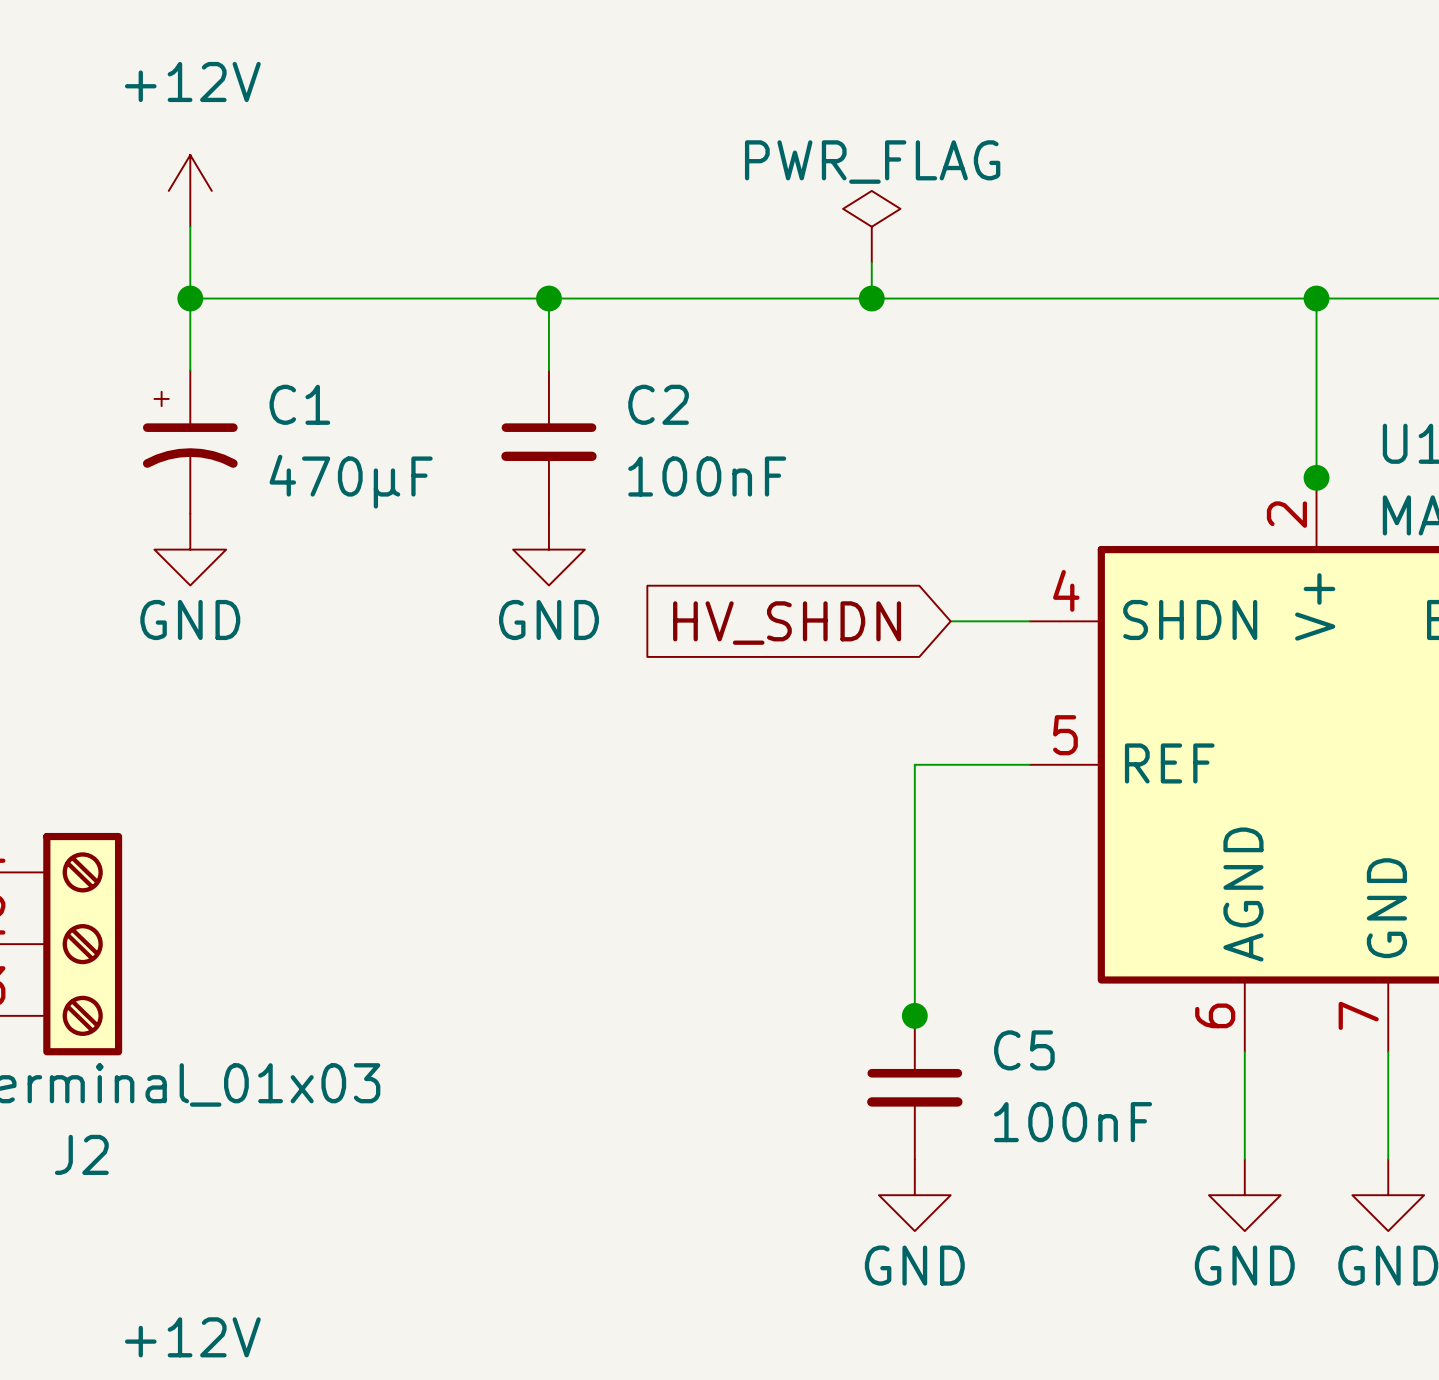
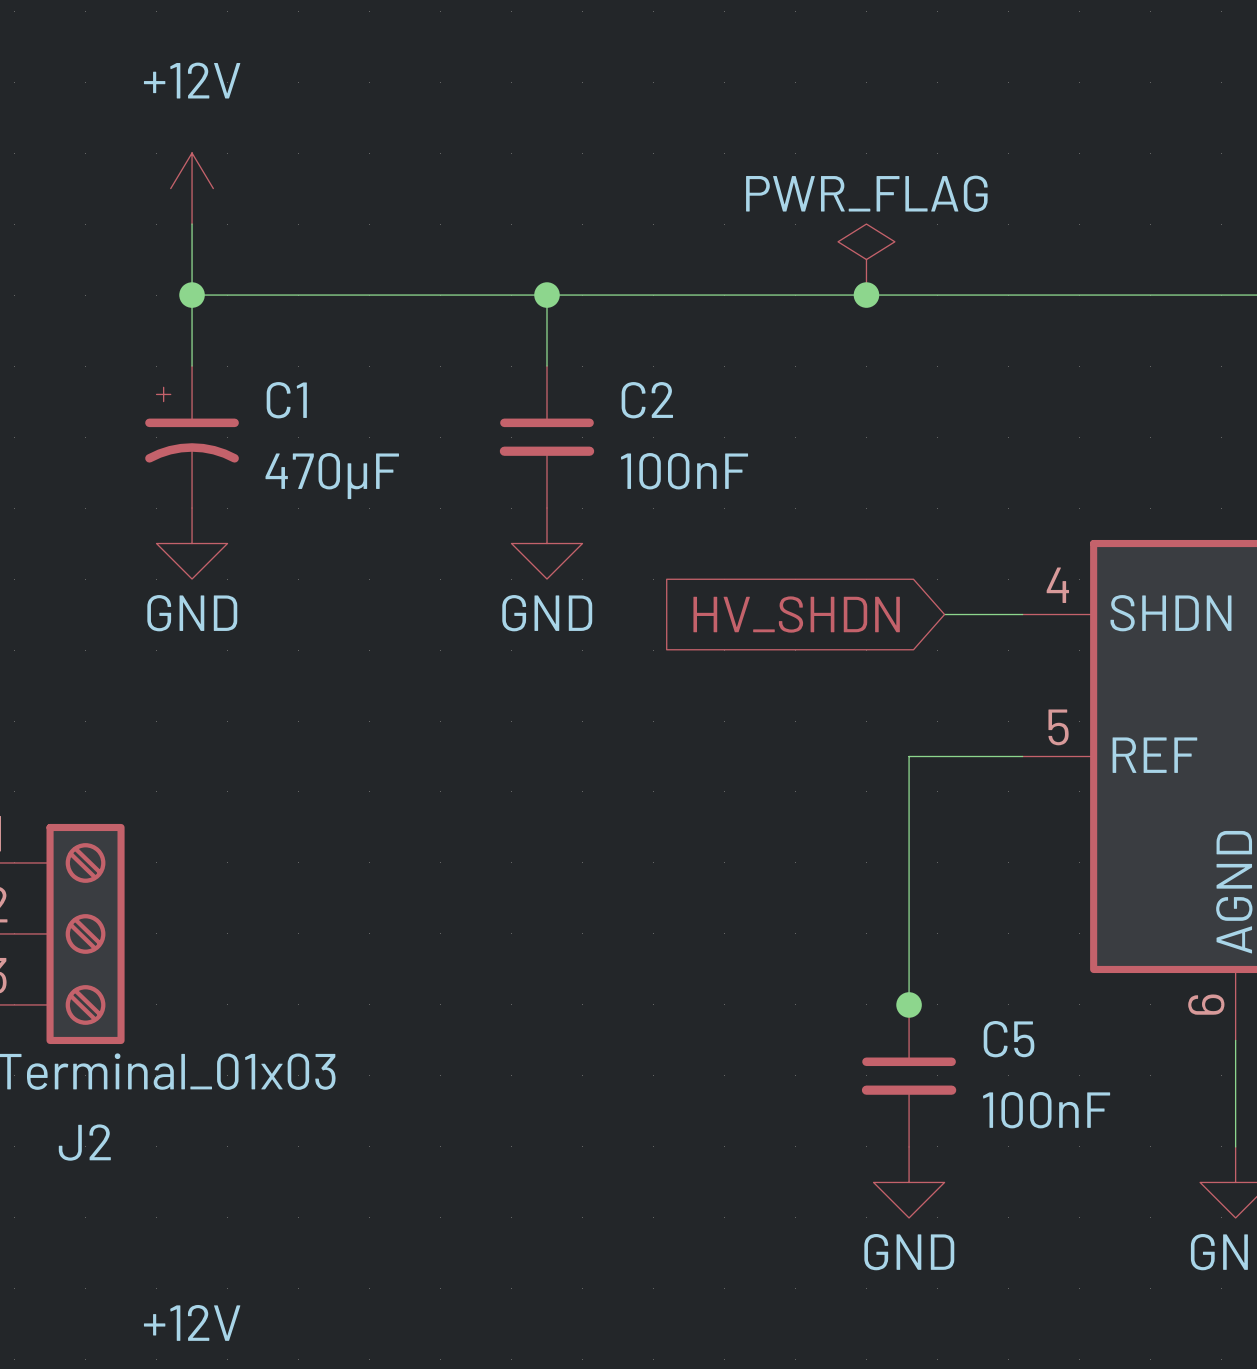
power symbol position: PWR_FLAG (871, 226) -> PWR_FLAG (866, 259)

